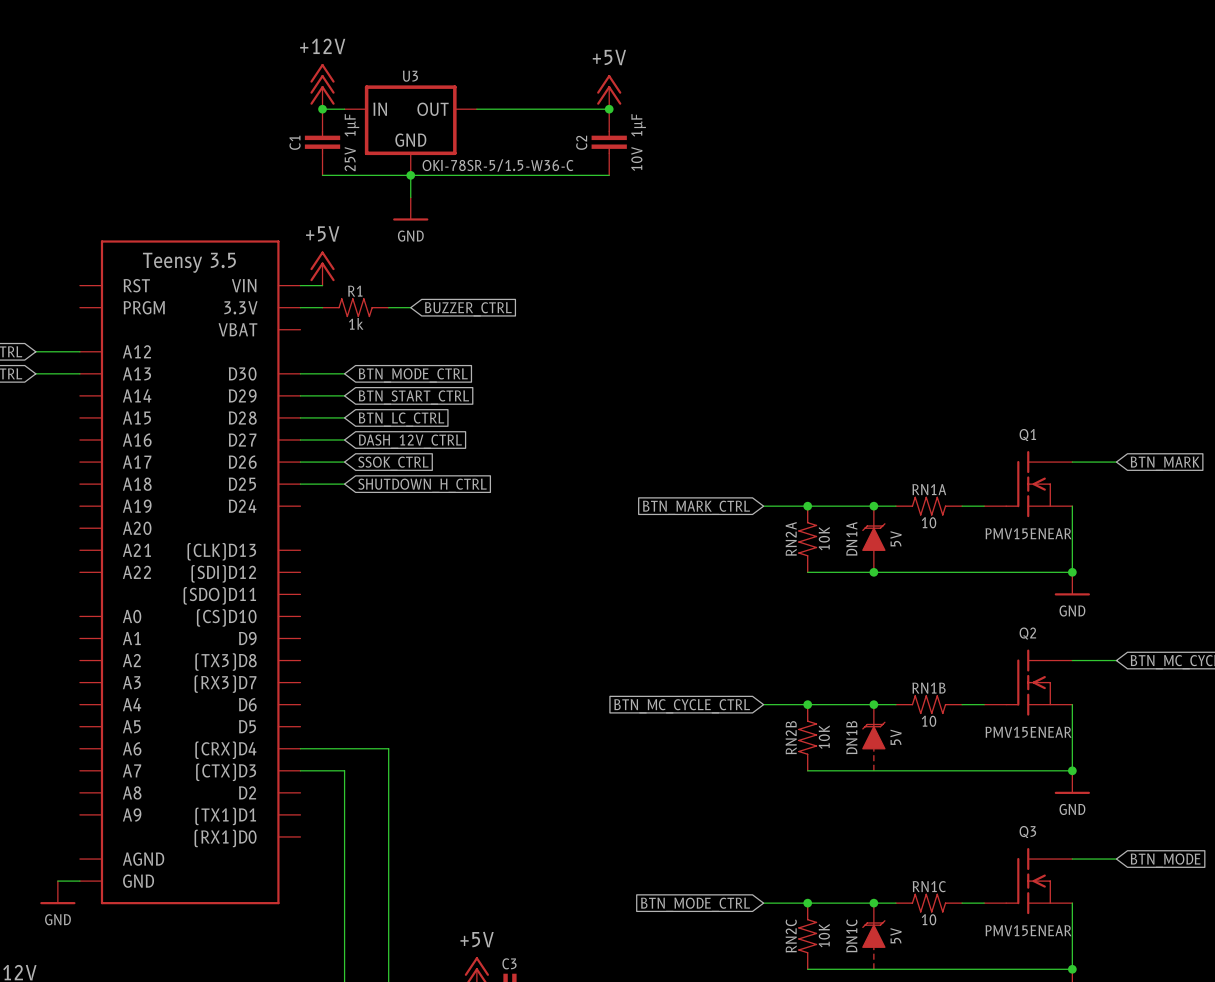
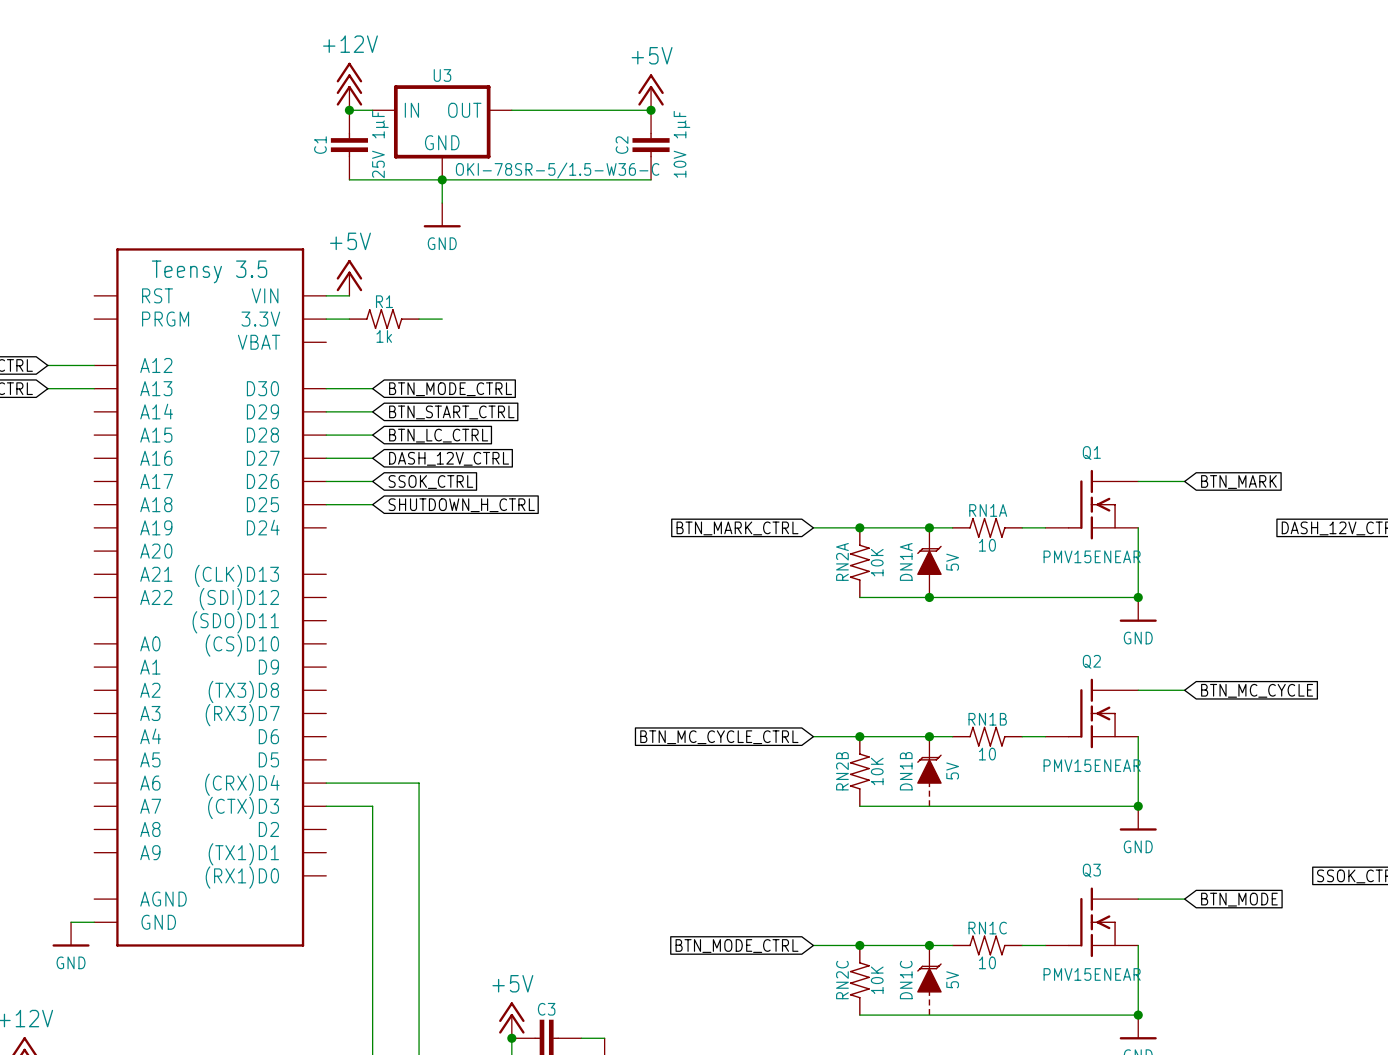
global label: BUZZER_CTRL (468, 309) -> none

